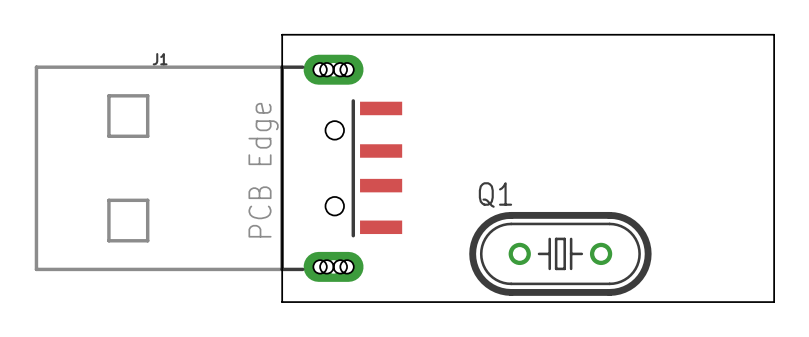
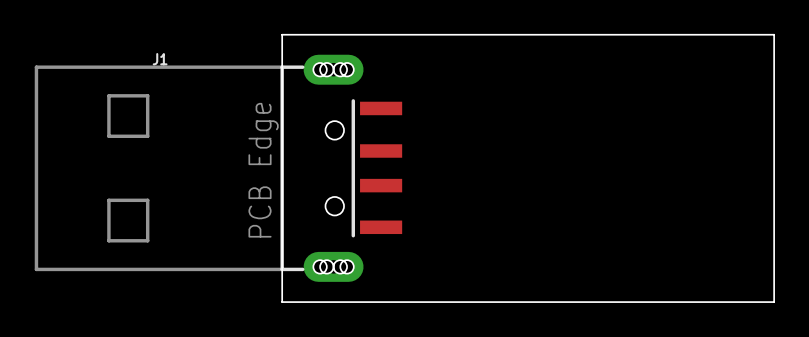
Q1: (560, 253) -> none

